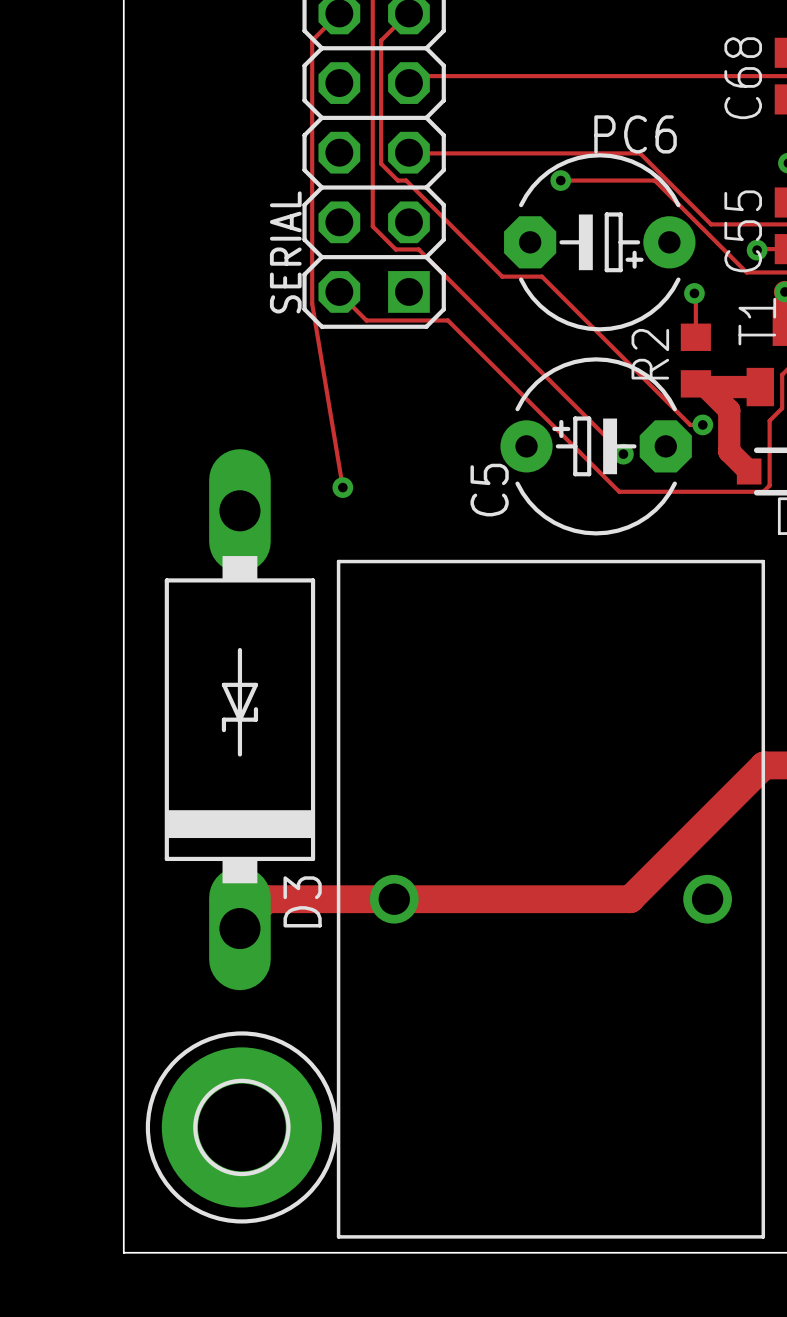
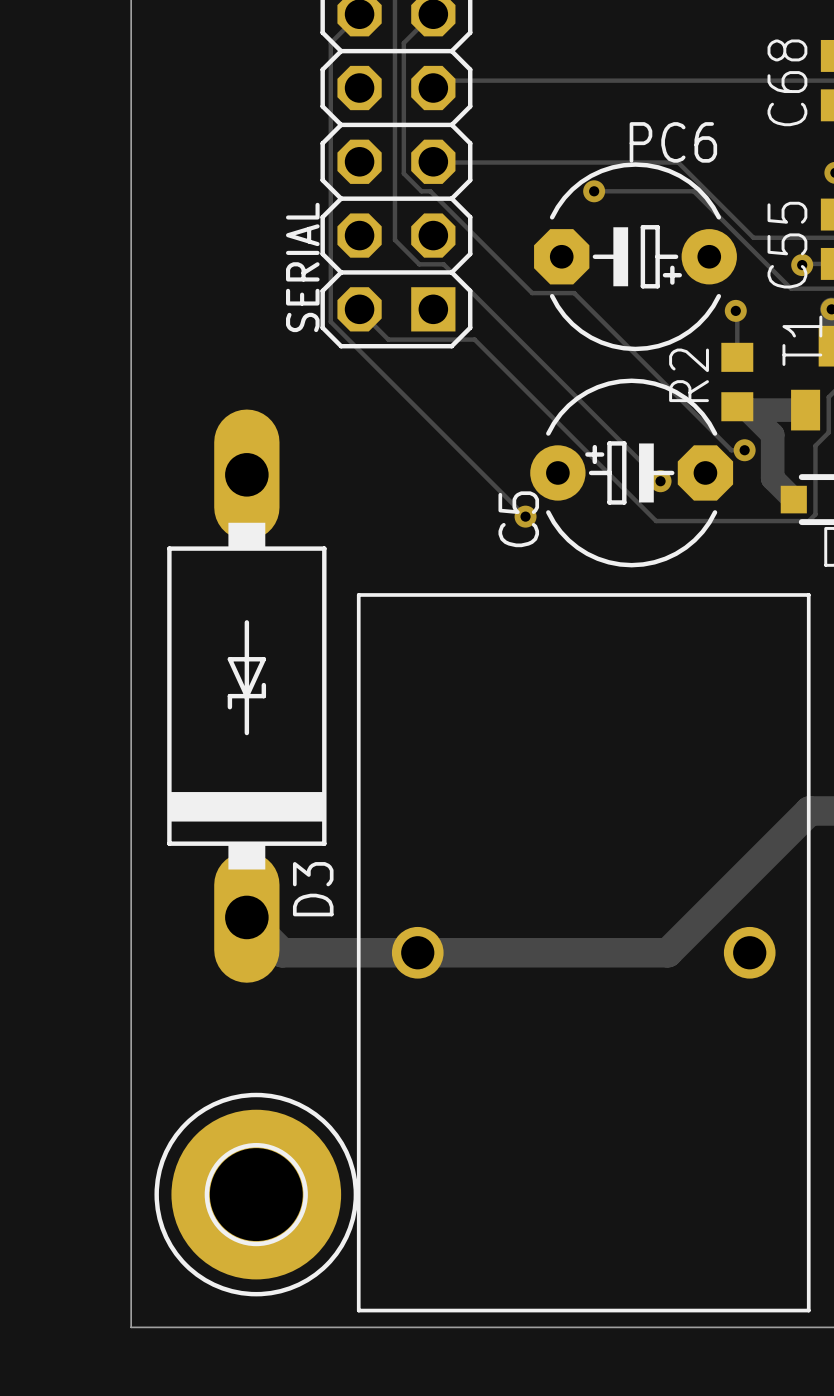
track: (312, 303) (342, 487) -> (330, 321) (525, 516)
via position: (342, 487) -> (525, 516)
D3 position: (239, 719) -> (246, 696)

